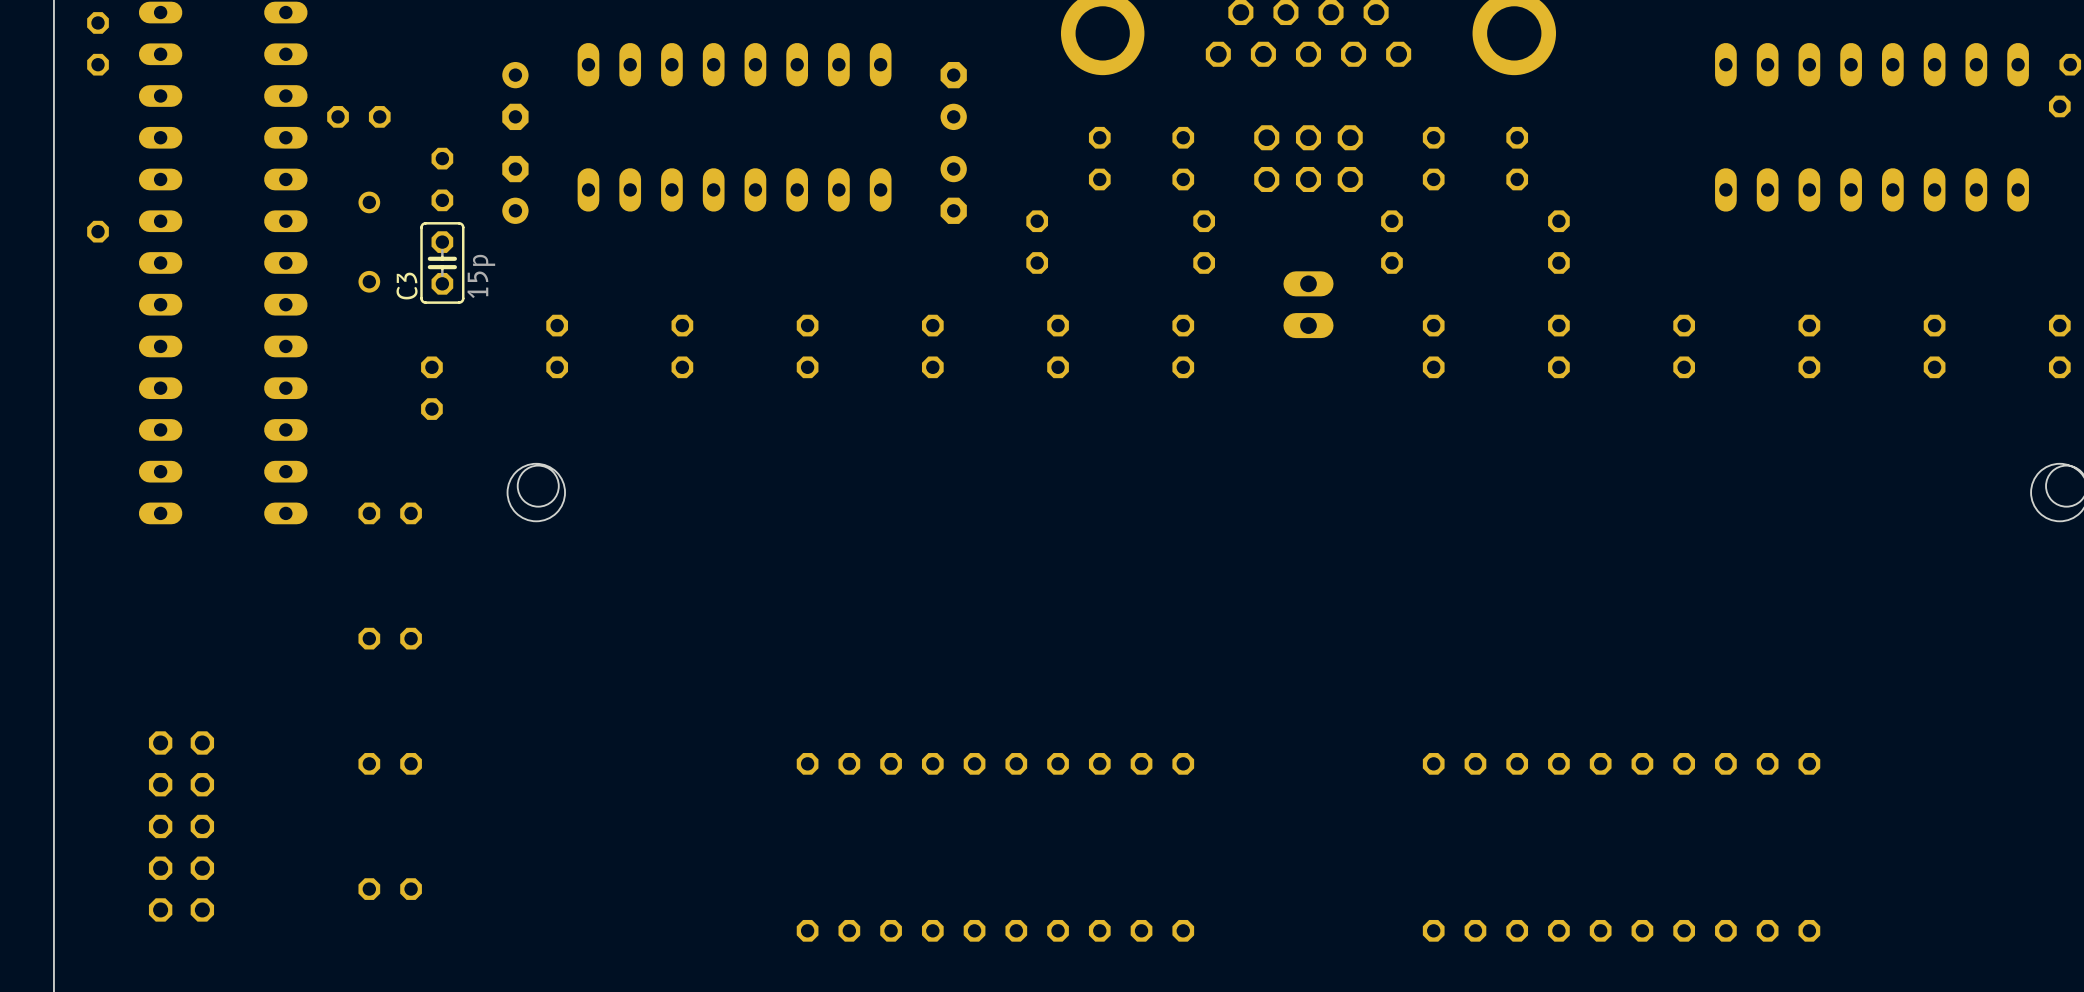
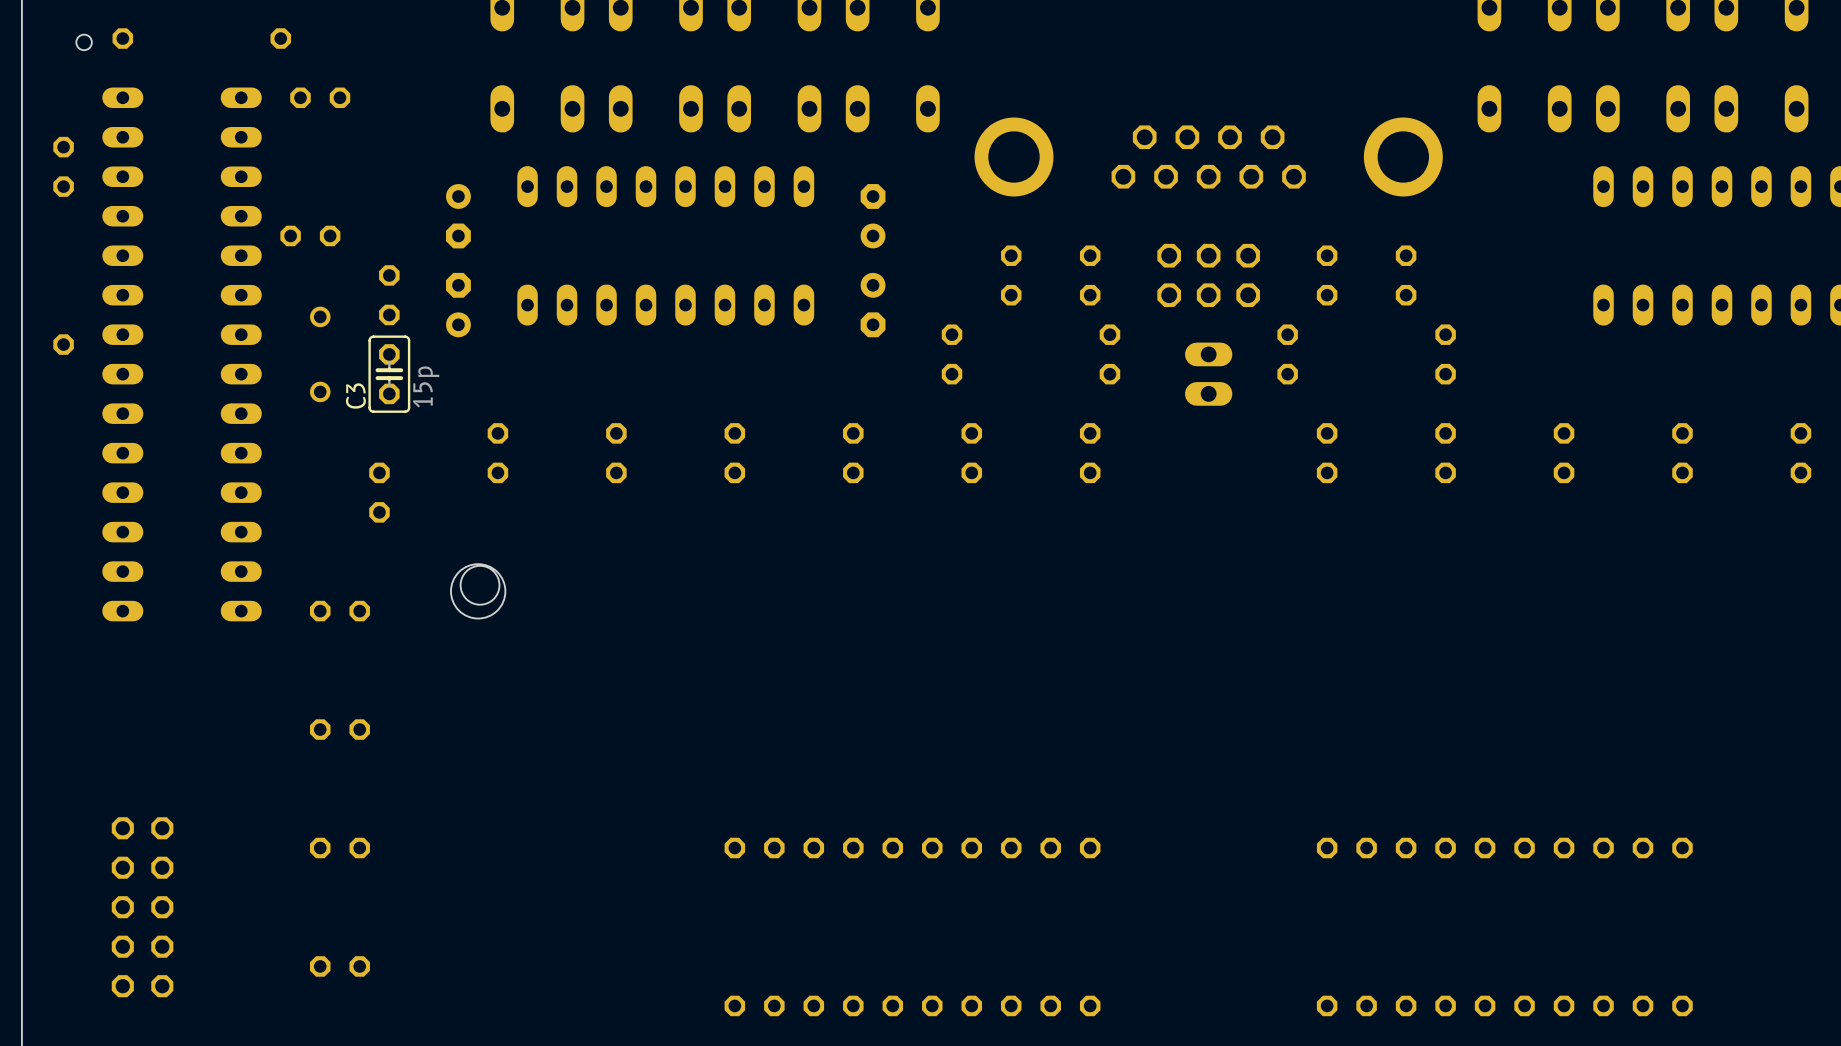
part position: (1308, 304) -> (1208, 374)

